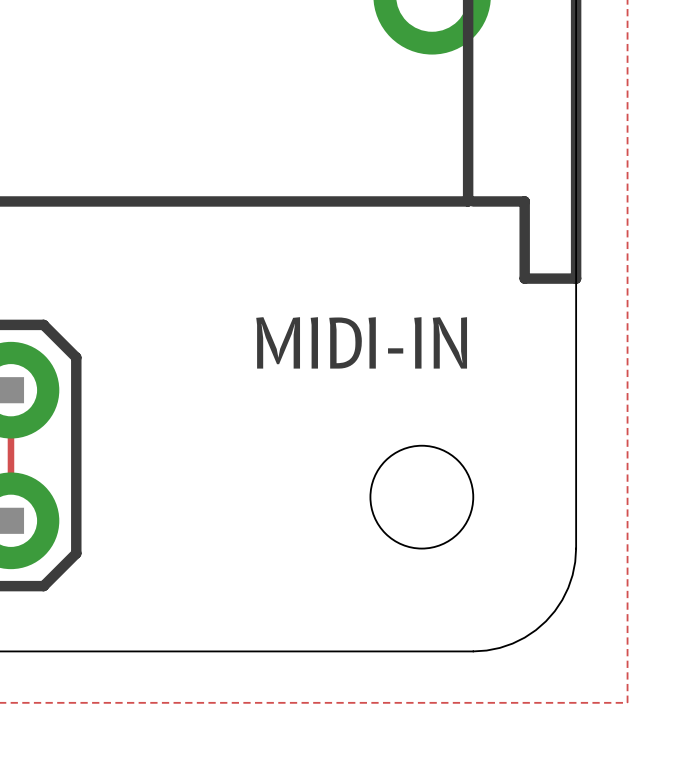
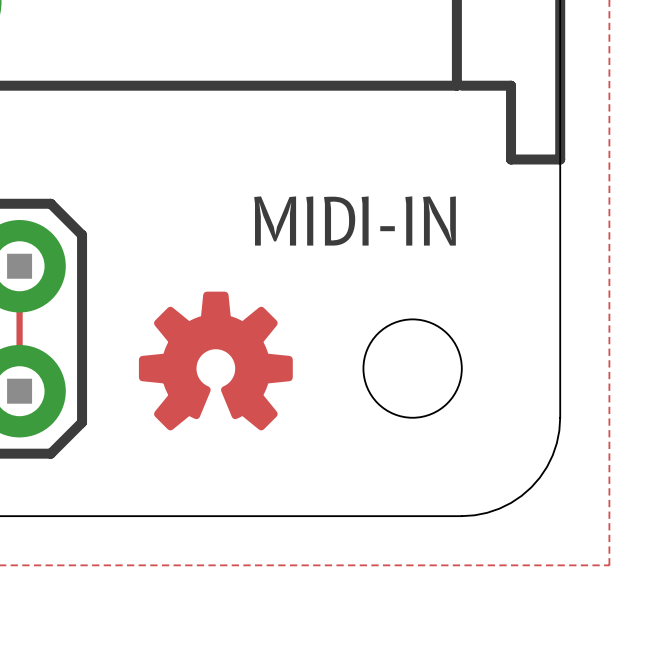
drawing: none -> [138, 291, 293, 431]

